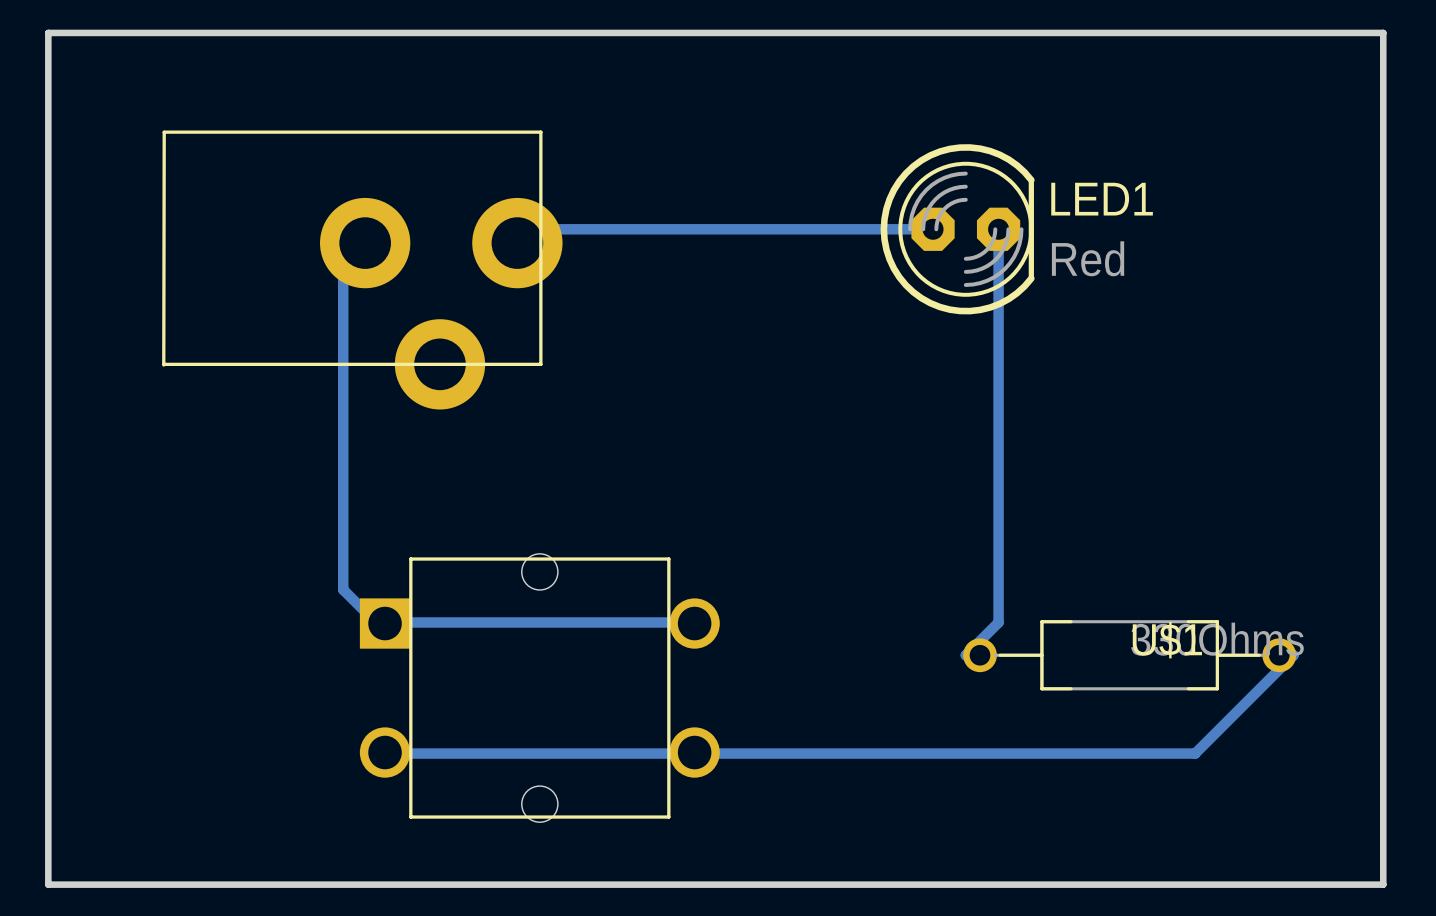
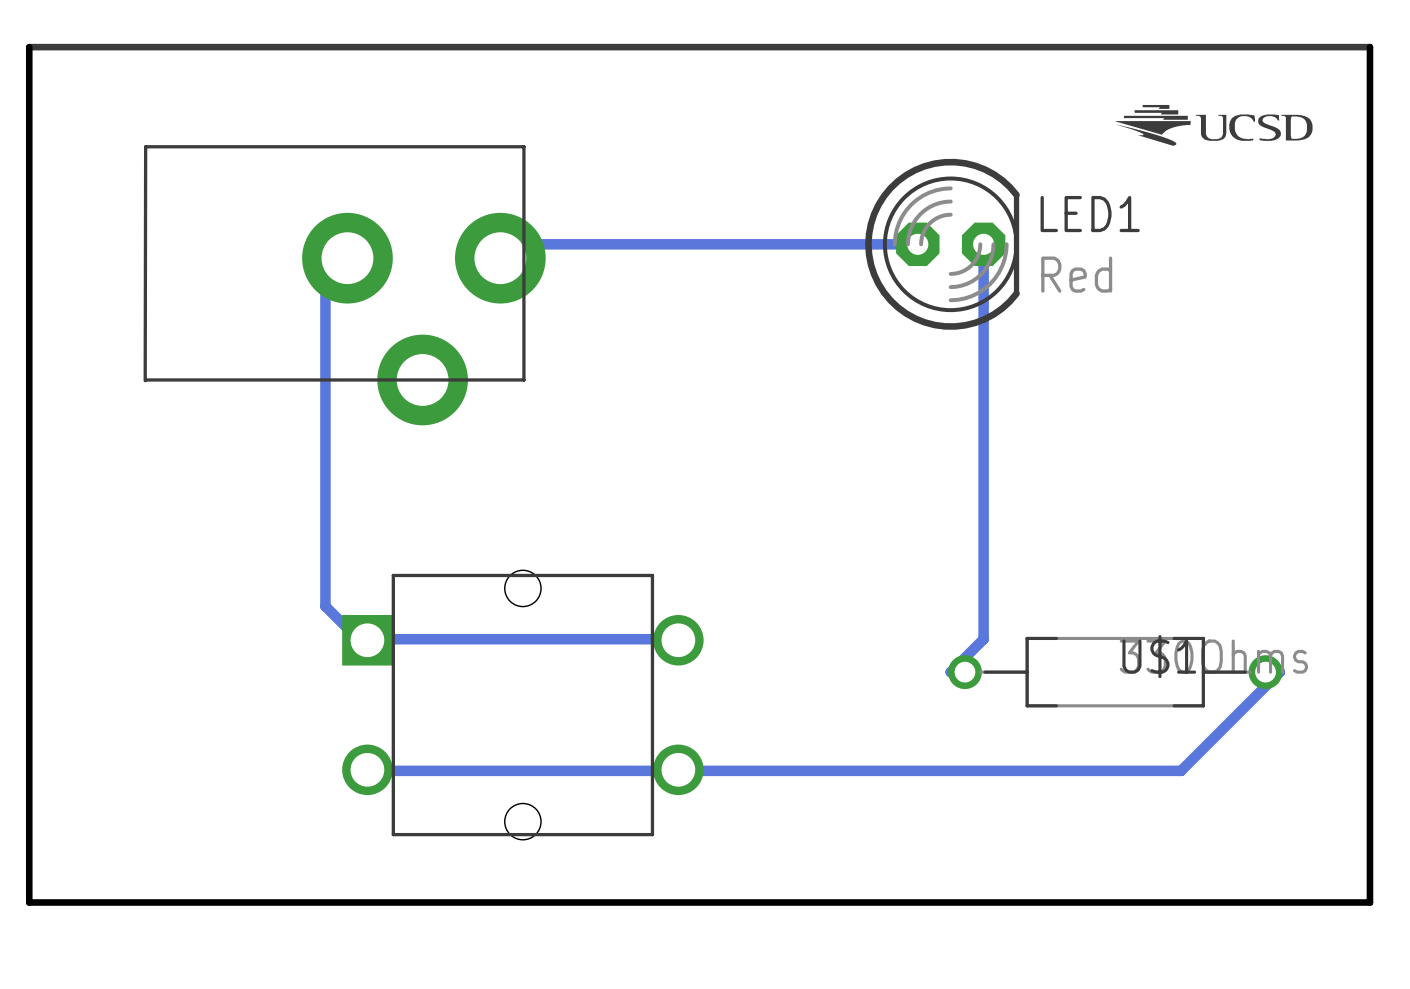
board edge: (48, 32) (1383, 32) -> none
line: none -> (29, 47) (1369, 47)
drawing: none -> [1115, 104, 1313, 146]

